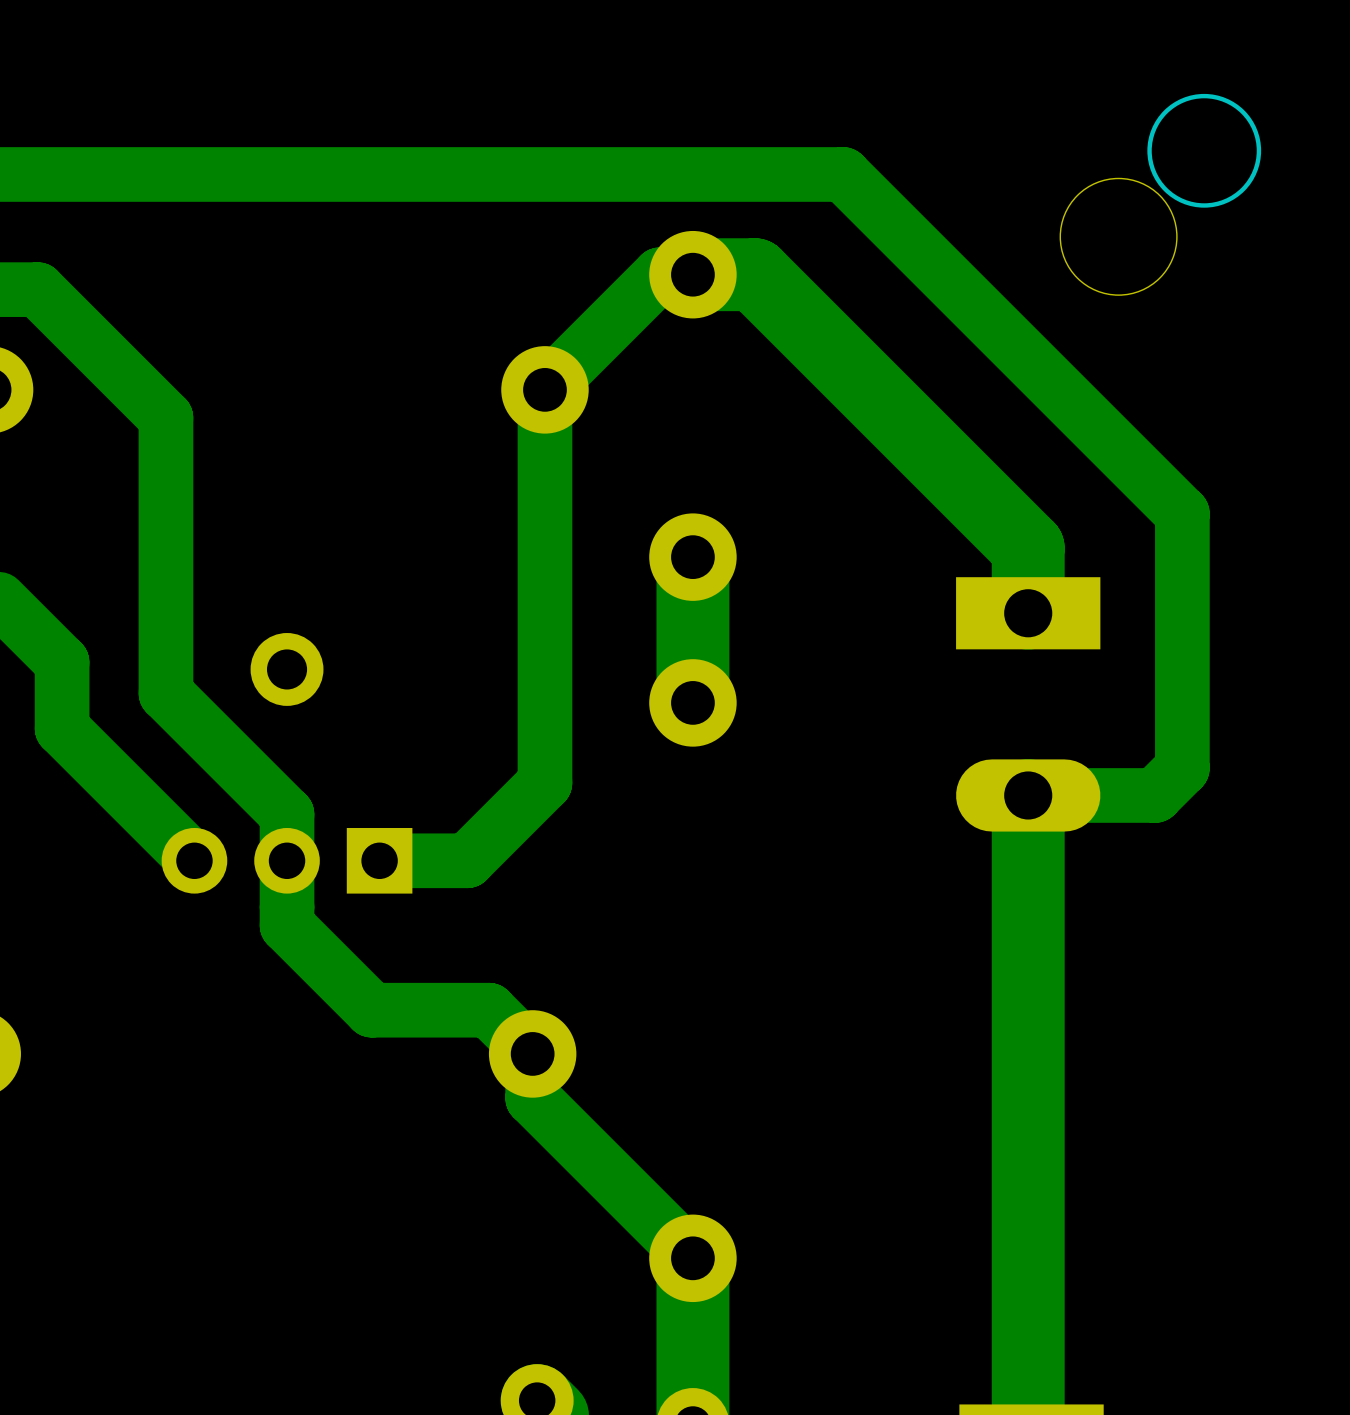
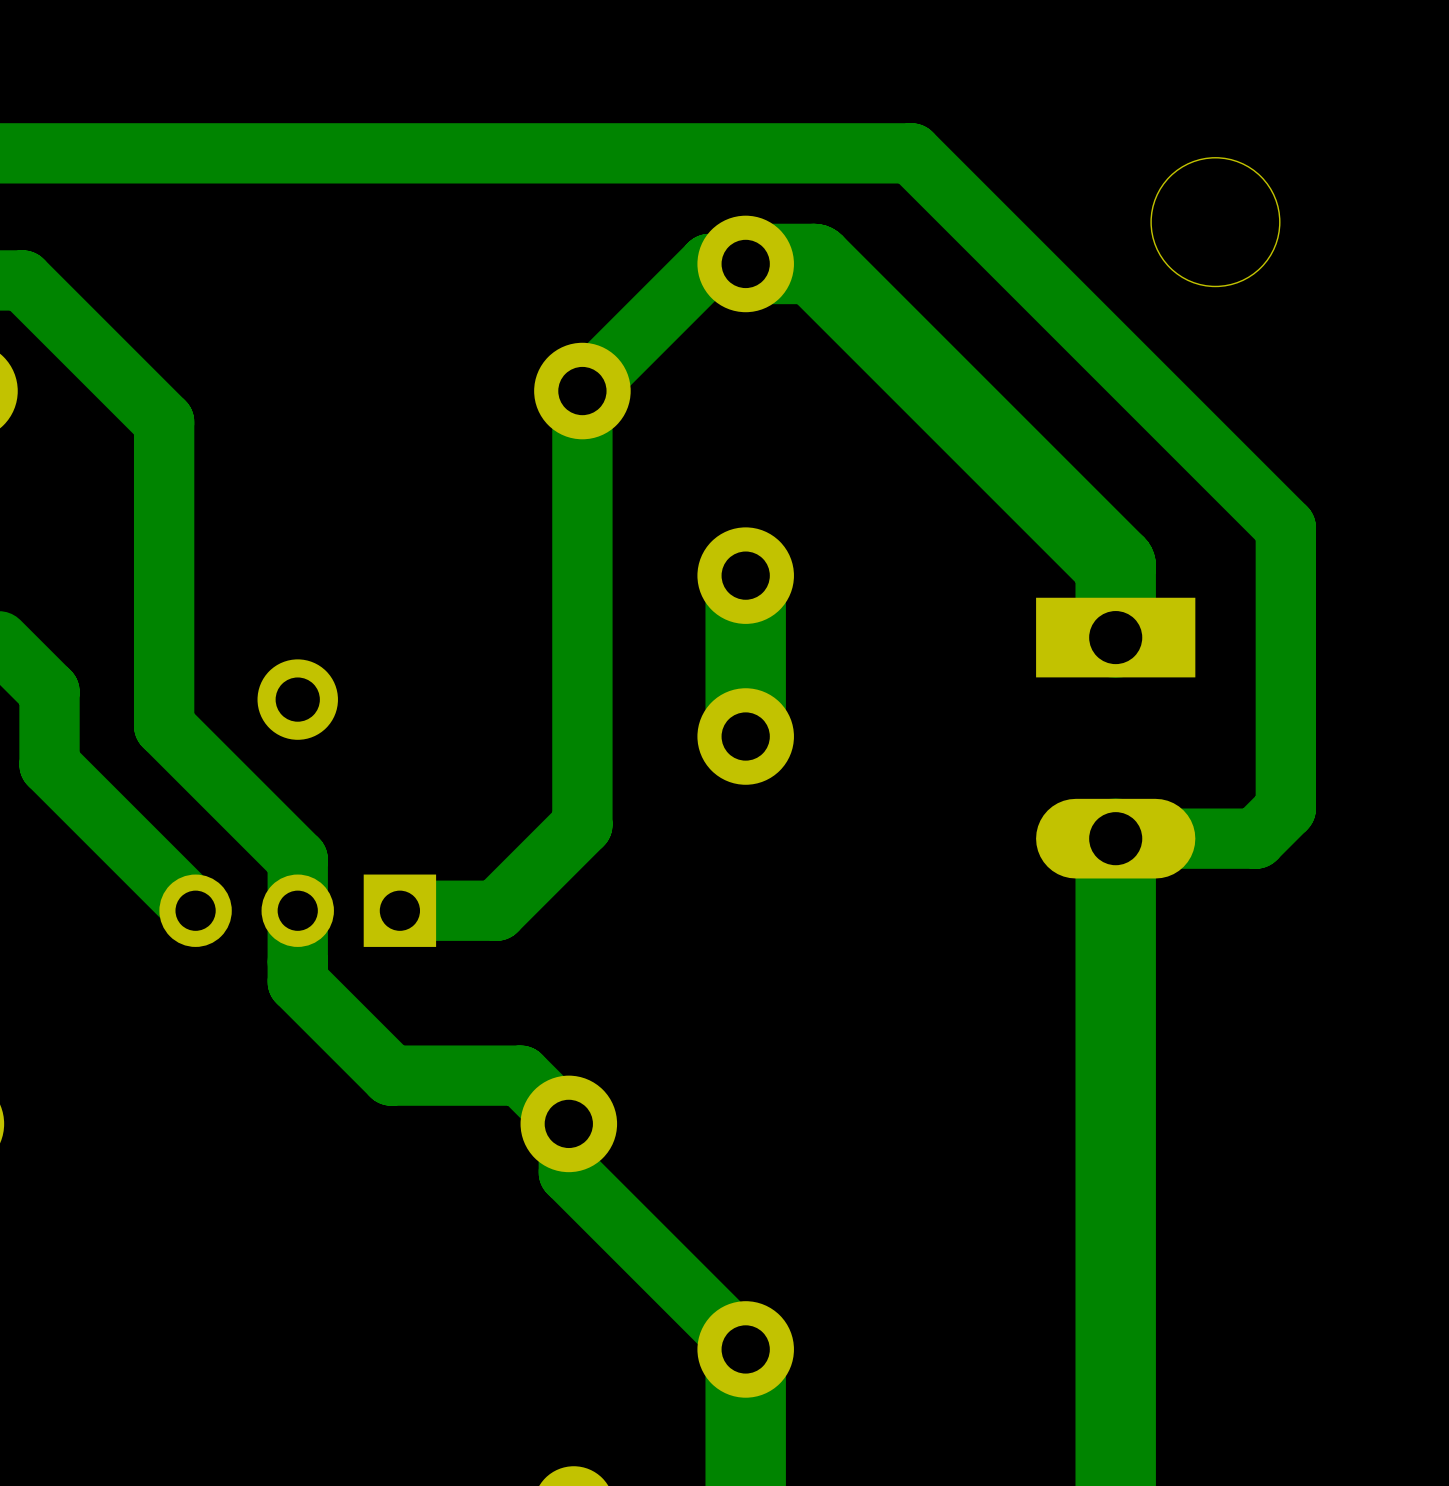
drawing: [1147, 93, 1262, 208] -> none

